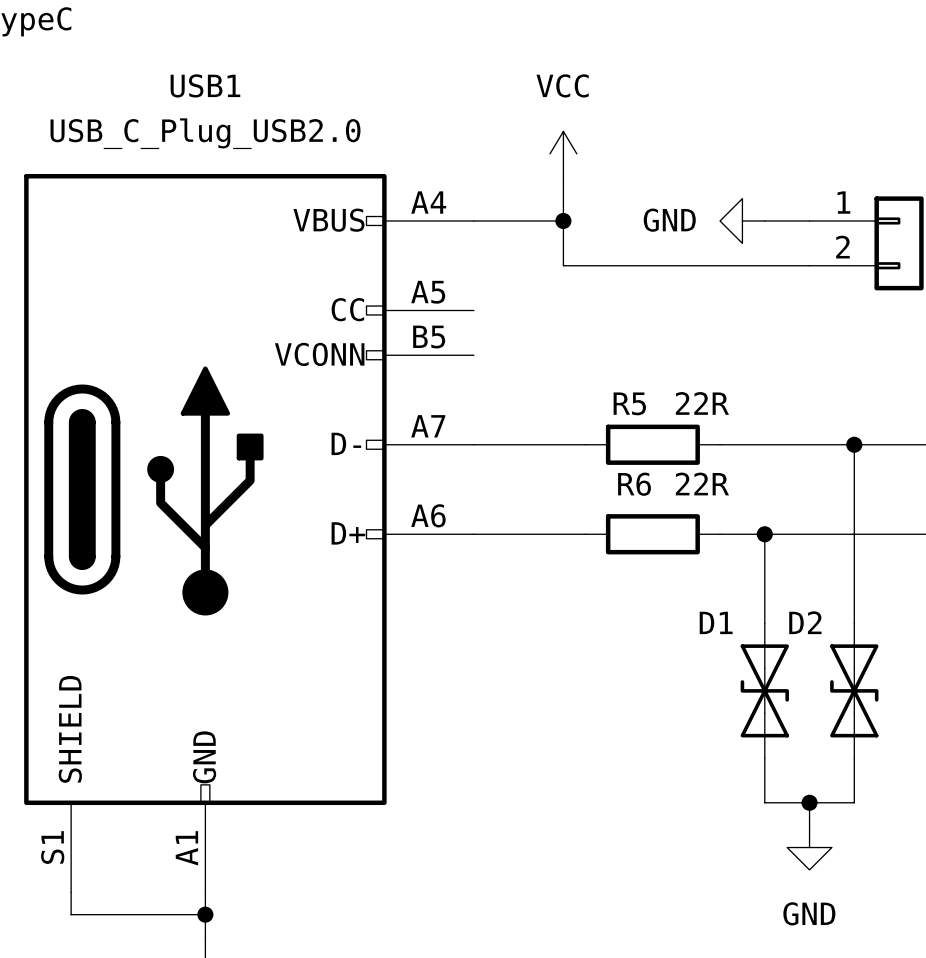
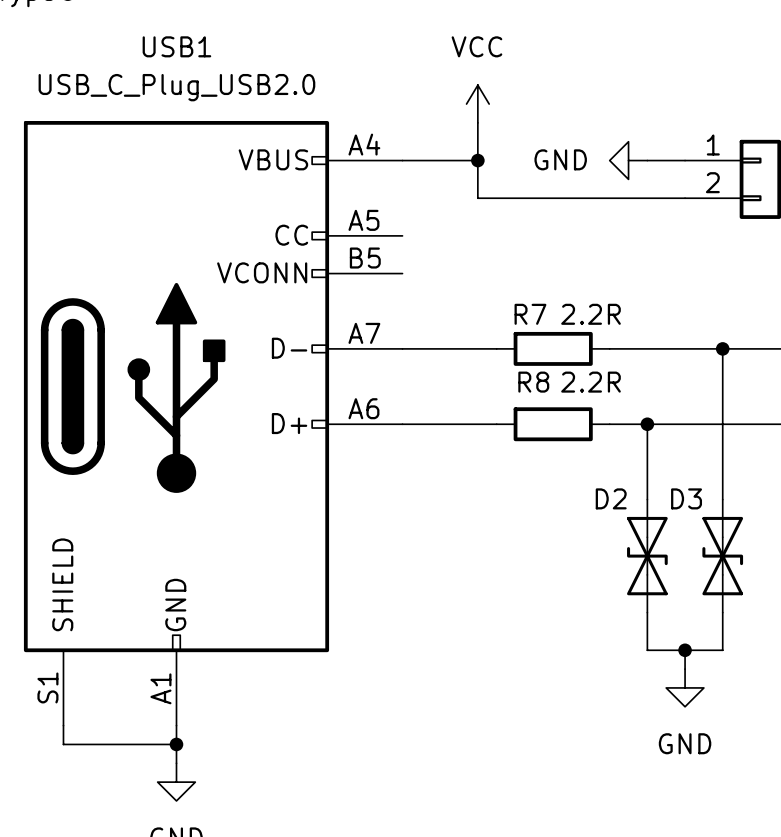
R5 name: R5 (629, 403) -> R7 (530, 314)
R6 value: 22R (702, 403) -> 2.2R (591, 382)
R6 name: R6 (634, 484) -> R8 (533, 382)
R5 value: 22R (702, 484) -> 2.2R (591, 314)
D1 name: D1 (716, 622) -> D2 (611, 498)
D2 name: D2 (805, 622) -> D3 (686, 498)

